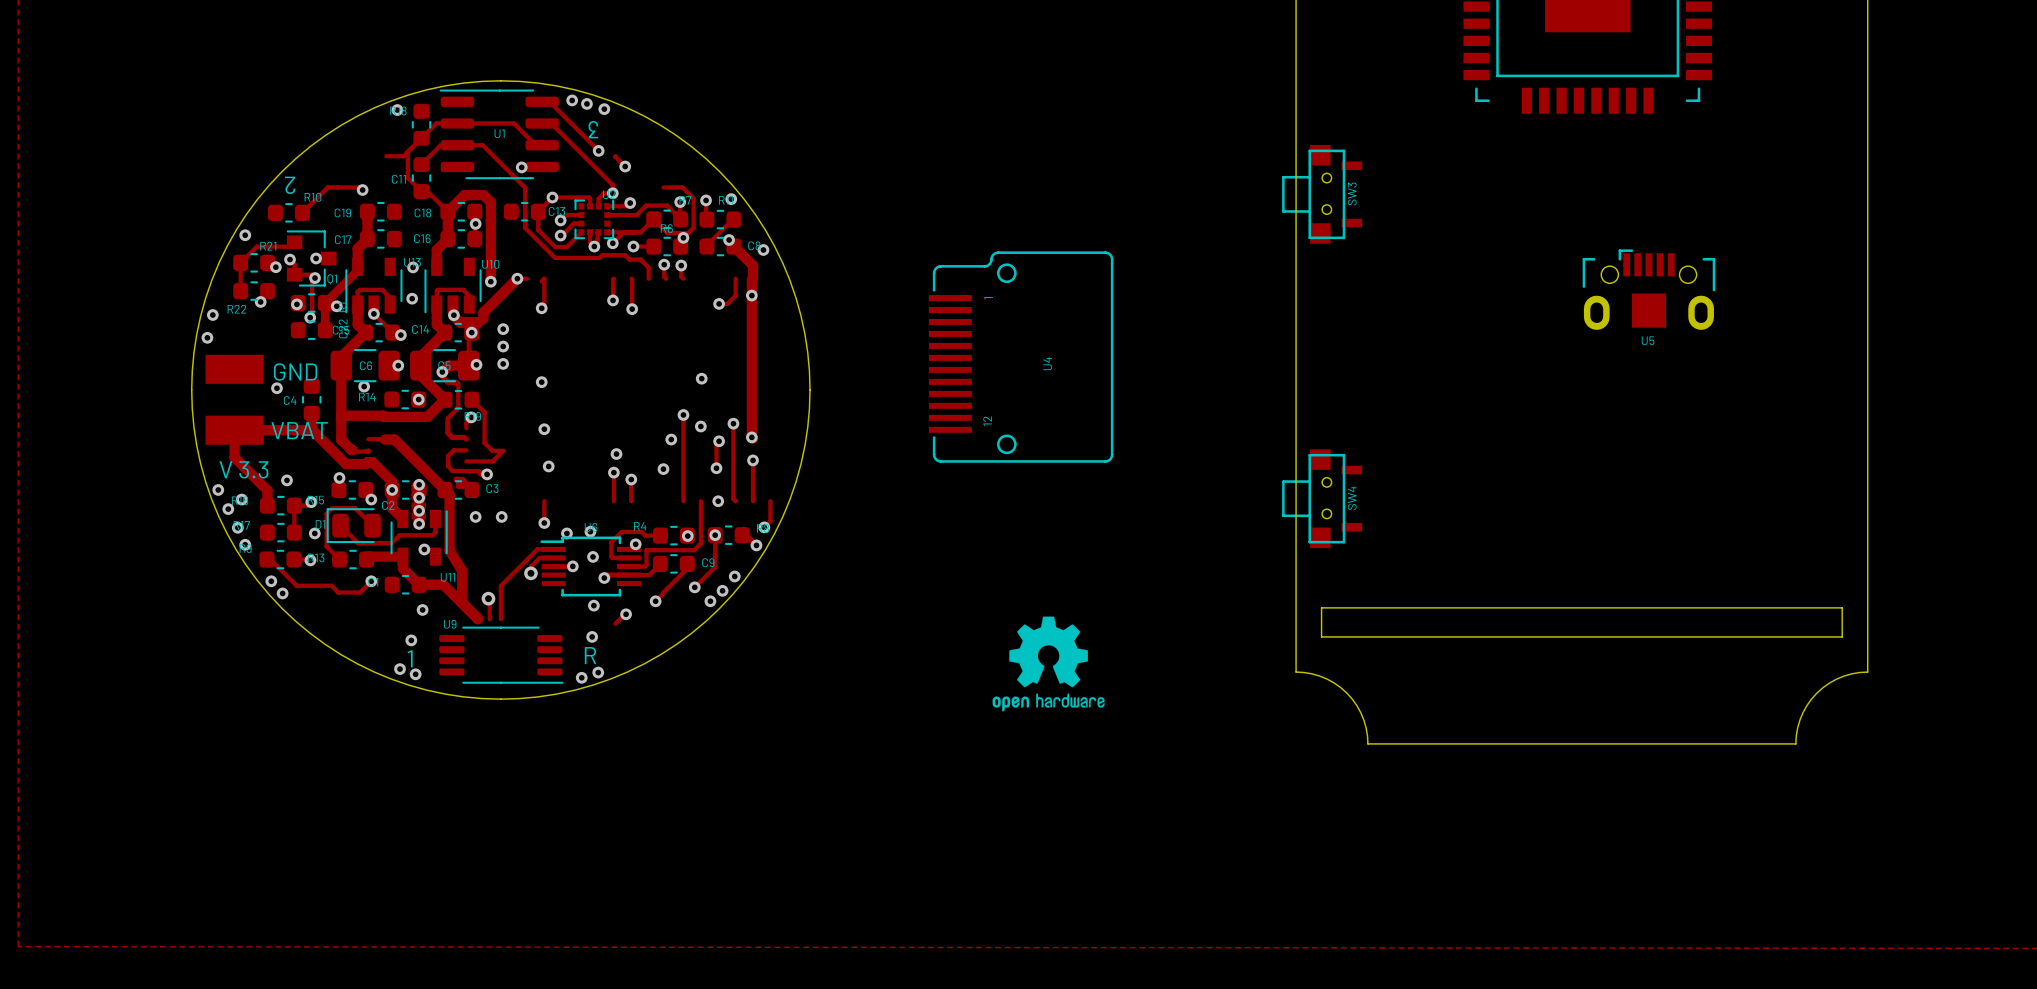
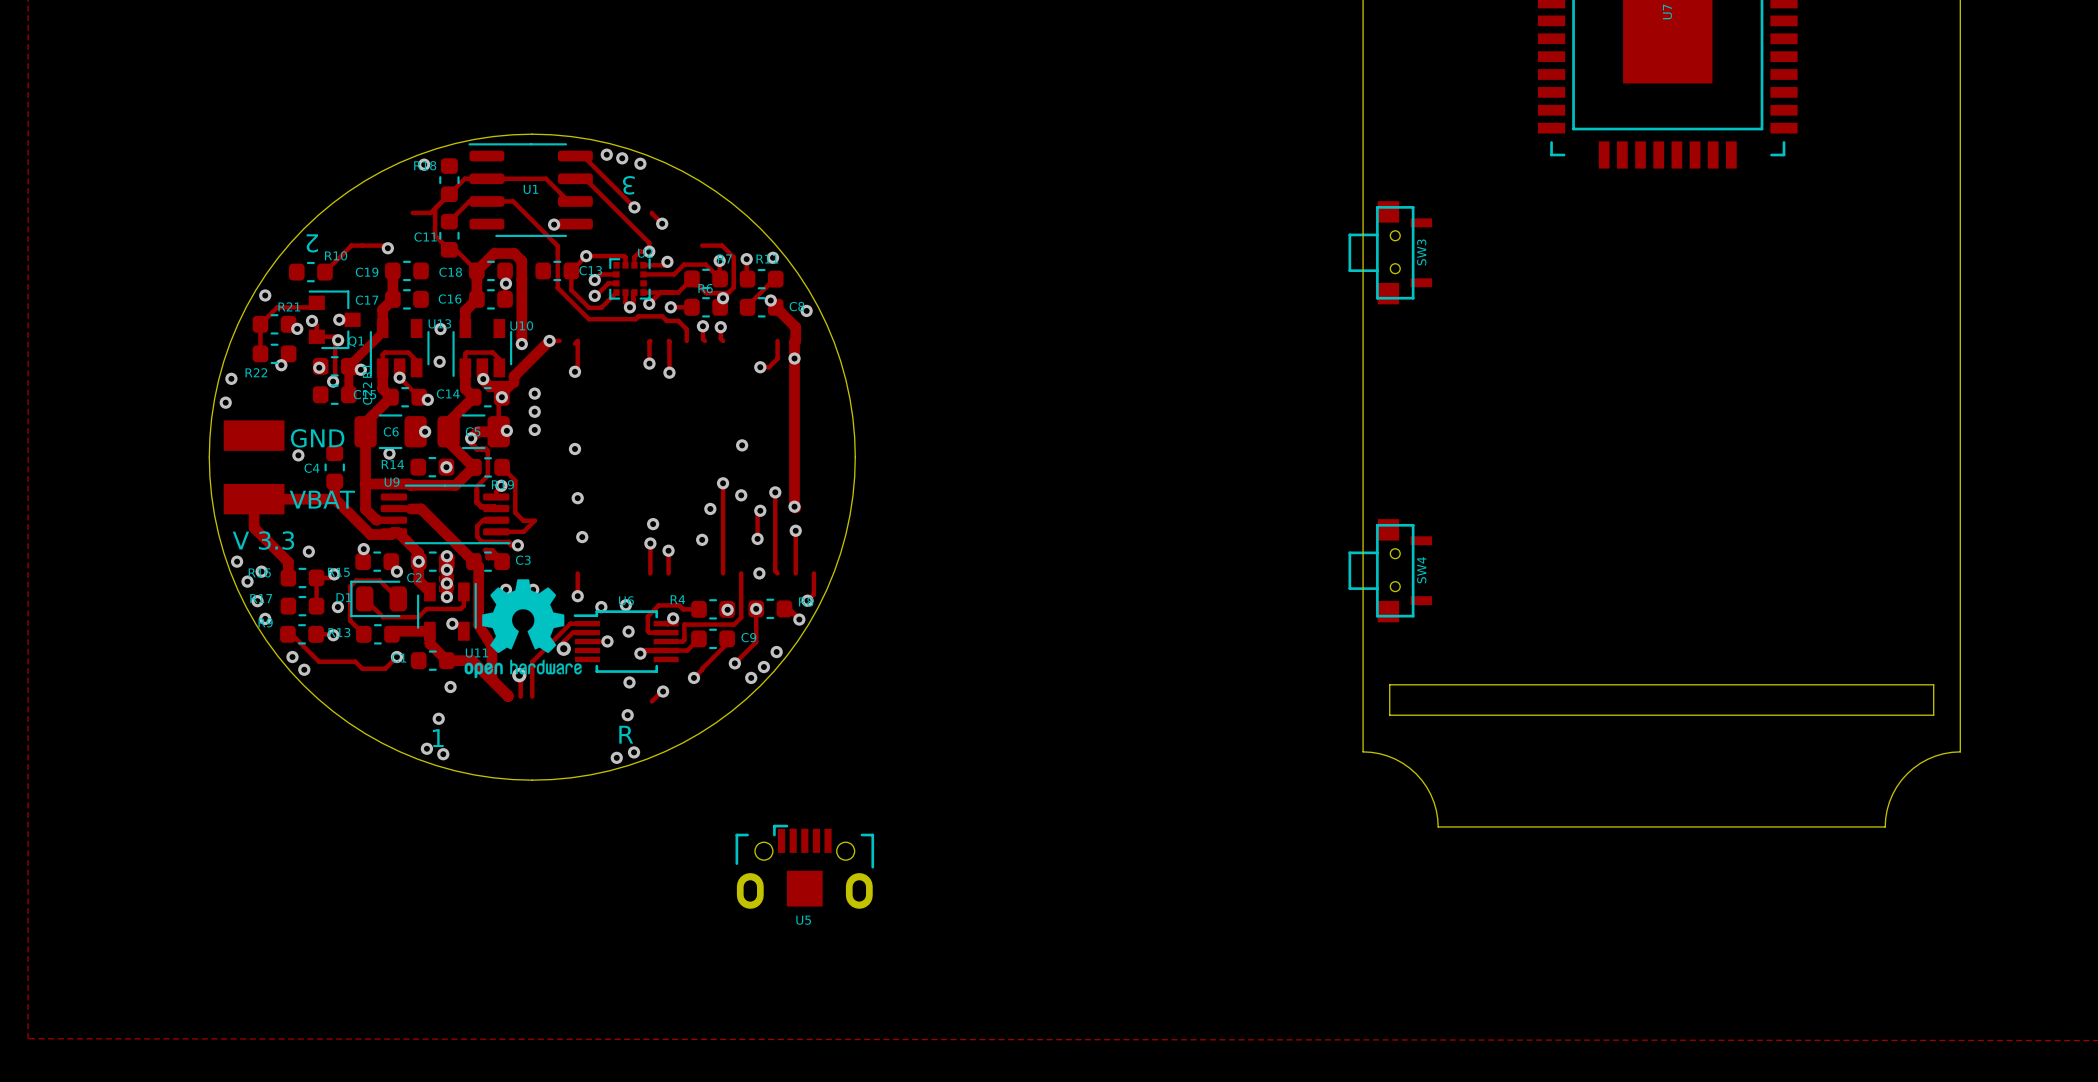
U5 footprint: [1582, 249, 1716, 330] -> [735, 824, 875, 909]
U4: (1021, 357) -> none
drawing: none -> [464, 579, 582, 679]
drawing: [992, 616, 1105, 712] -> none
U9 position: (501, 655) -> (445, 514)

